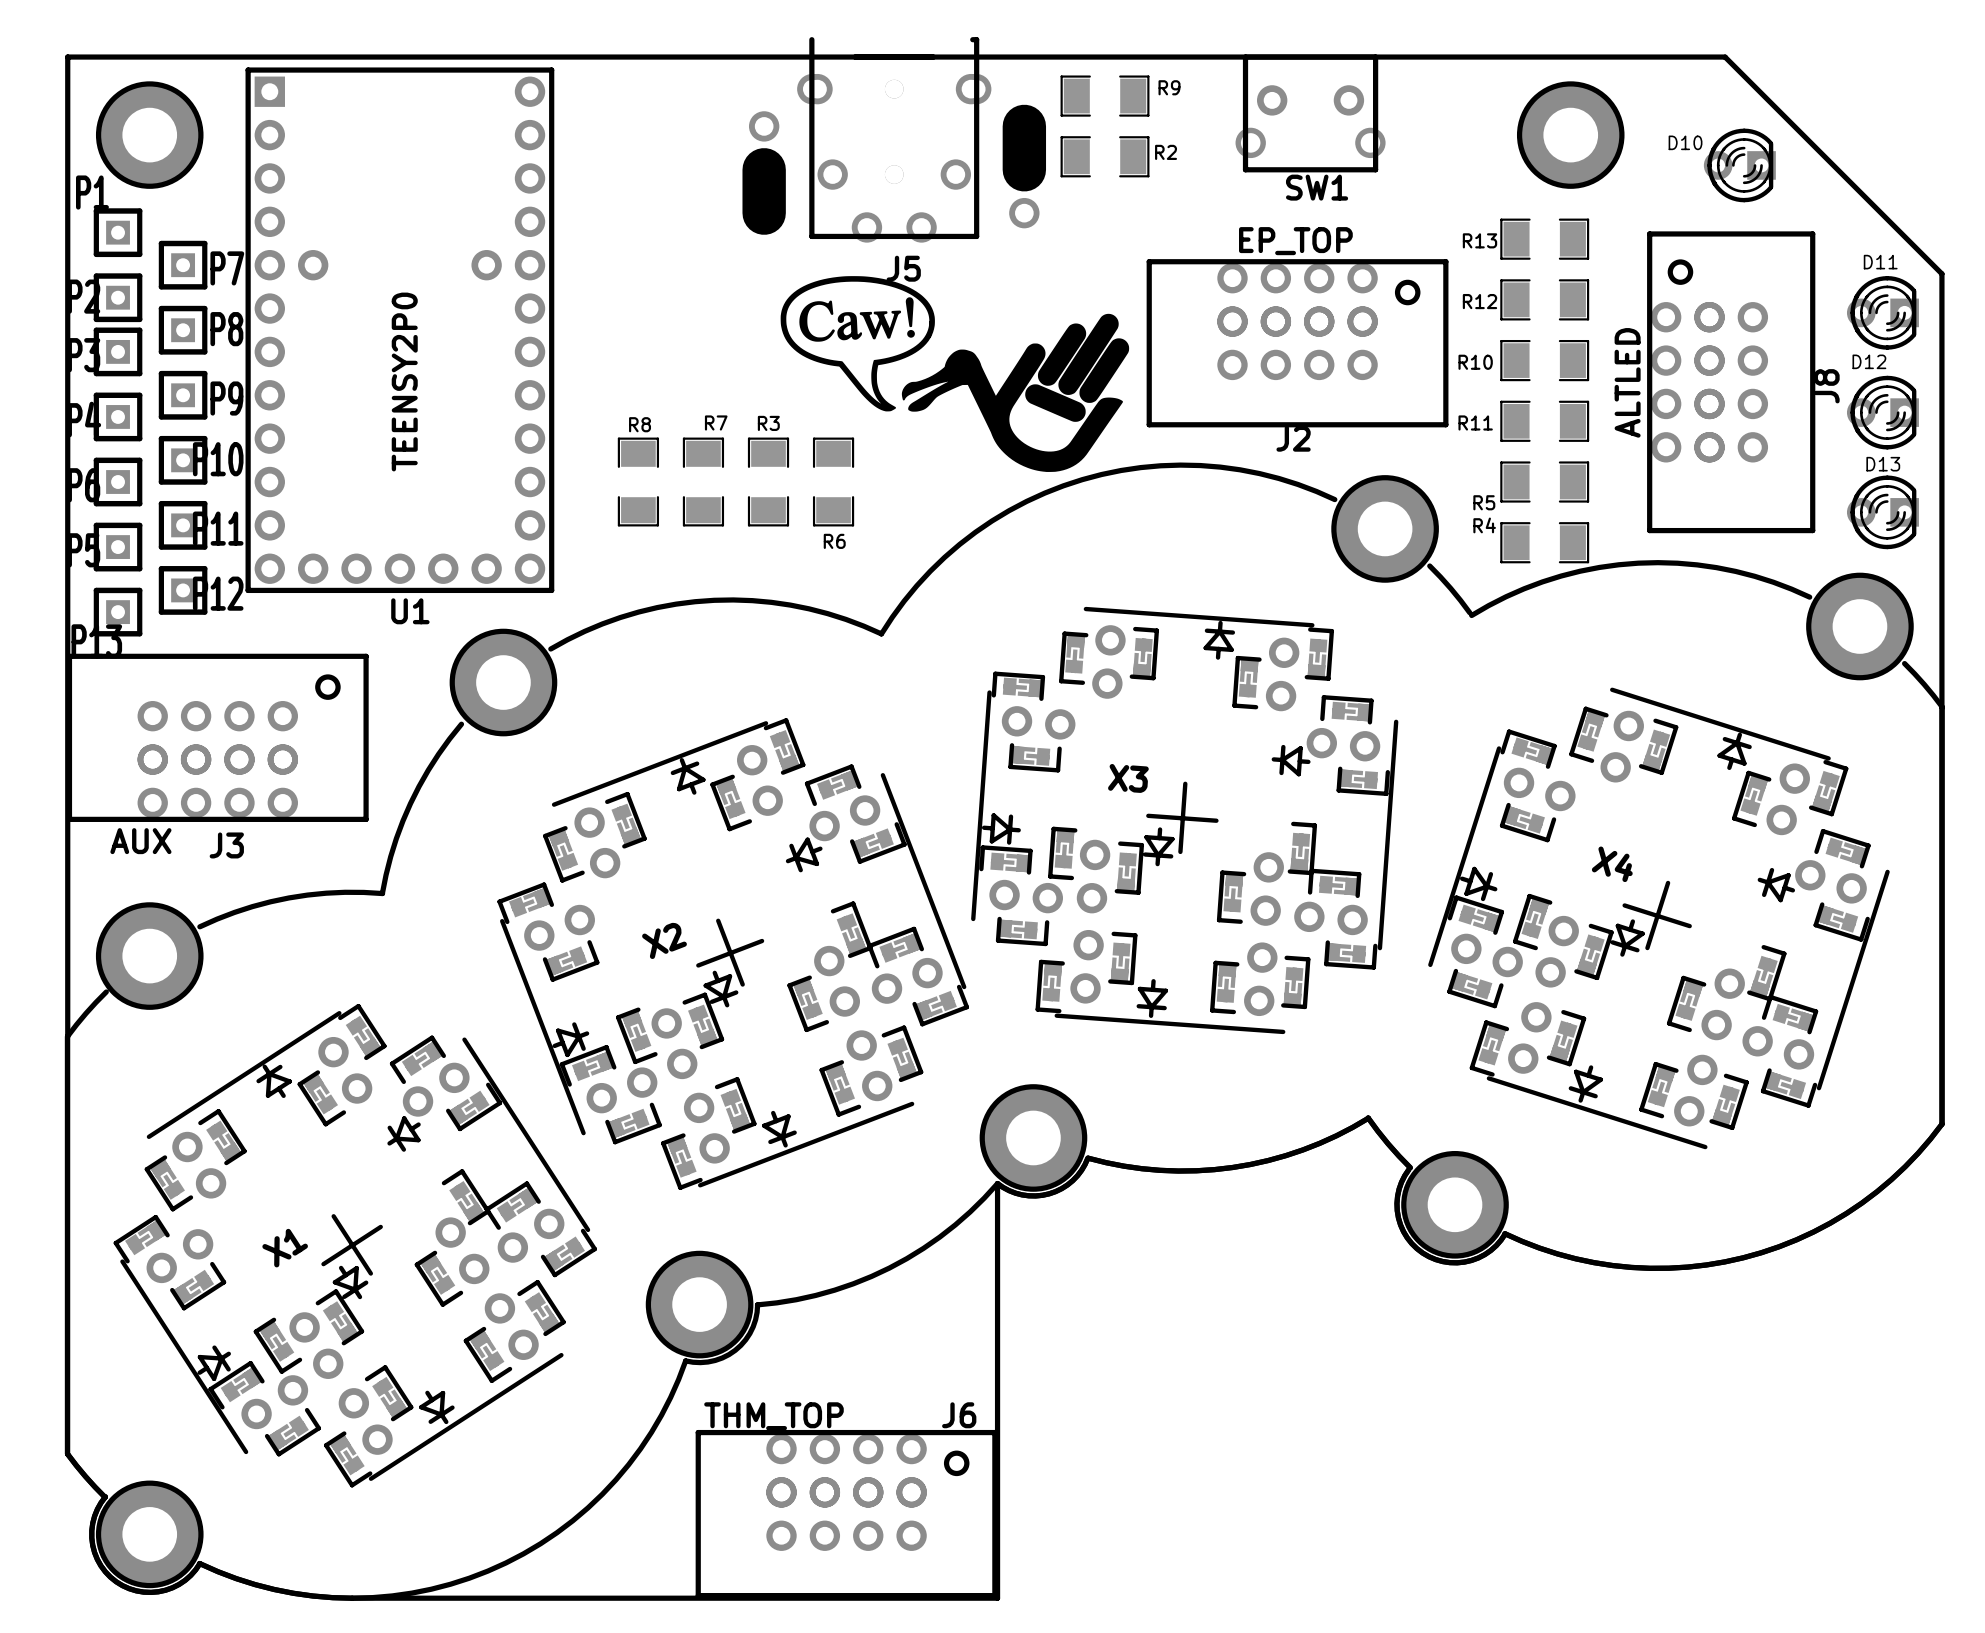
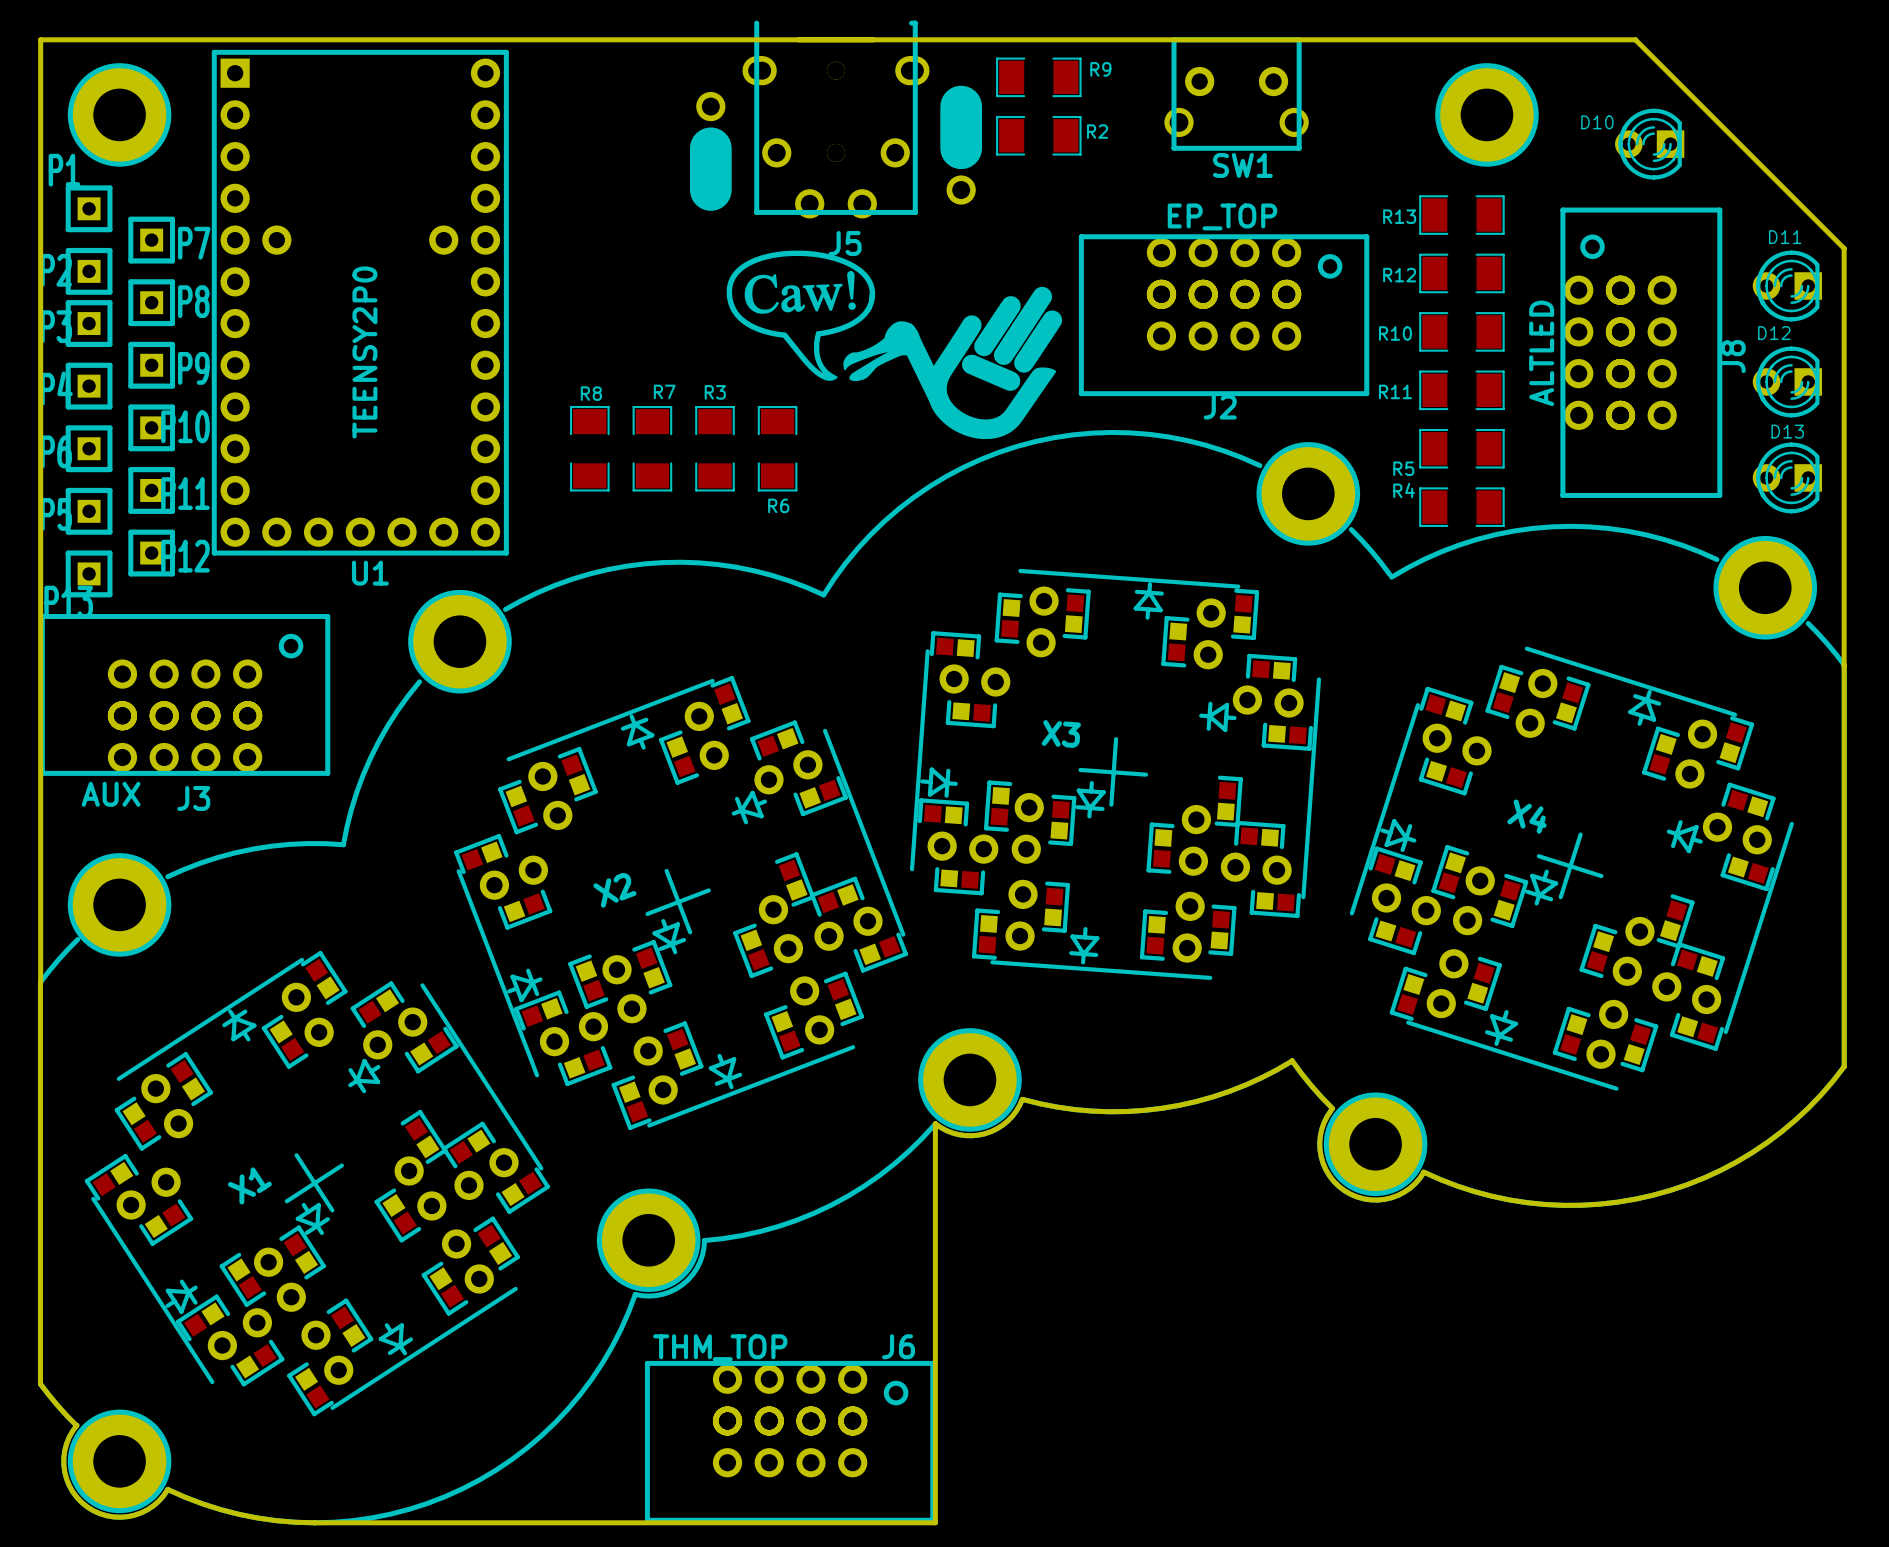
X3 footprint: [971, 606, 1399, 1035] -> [909, 568, 1322, 980]
X4 footprint: [1428, 687, 1890, 1150] -> [1349, 646, 1794, 1091]
X2 footprint: [497, 718, 970, 1190] -> [454, 676, 908, 1130]
X1 footprint: [113, 1003, 598, 1488] -> [84, 950, 550, 1417]

